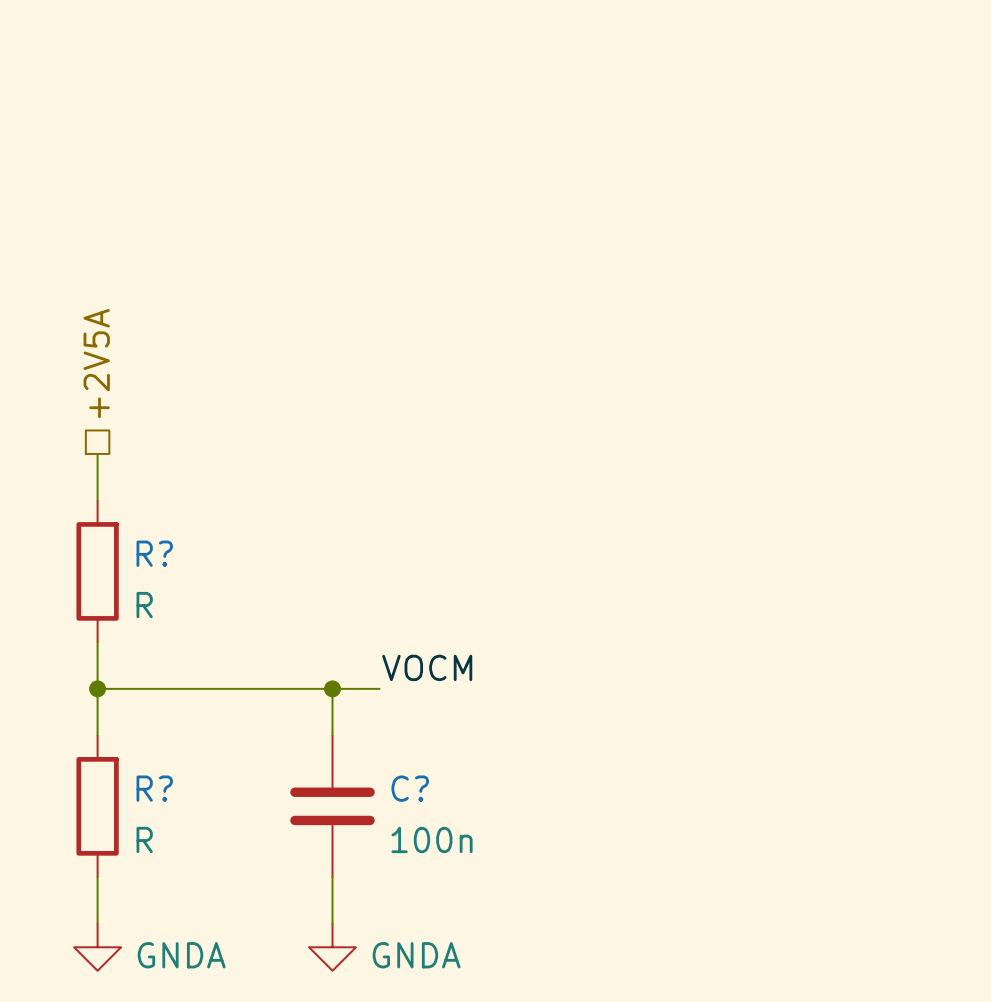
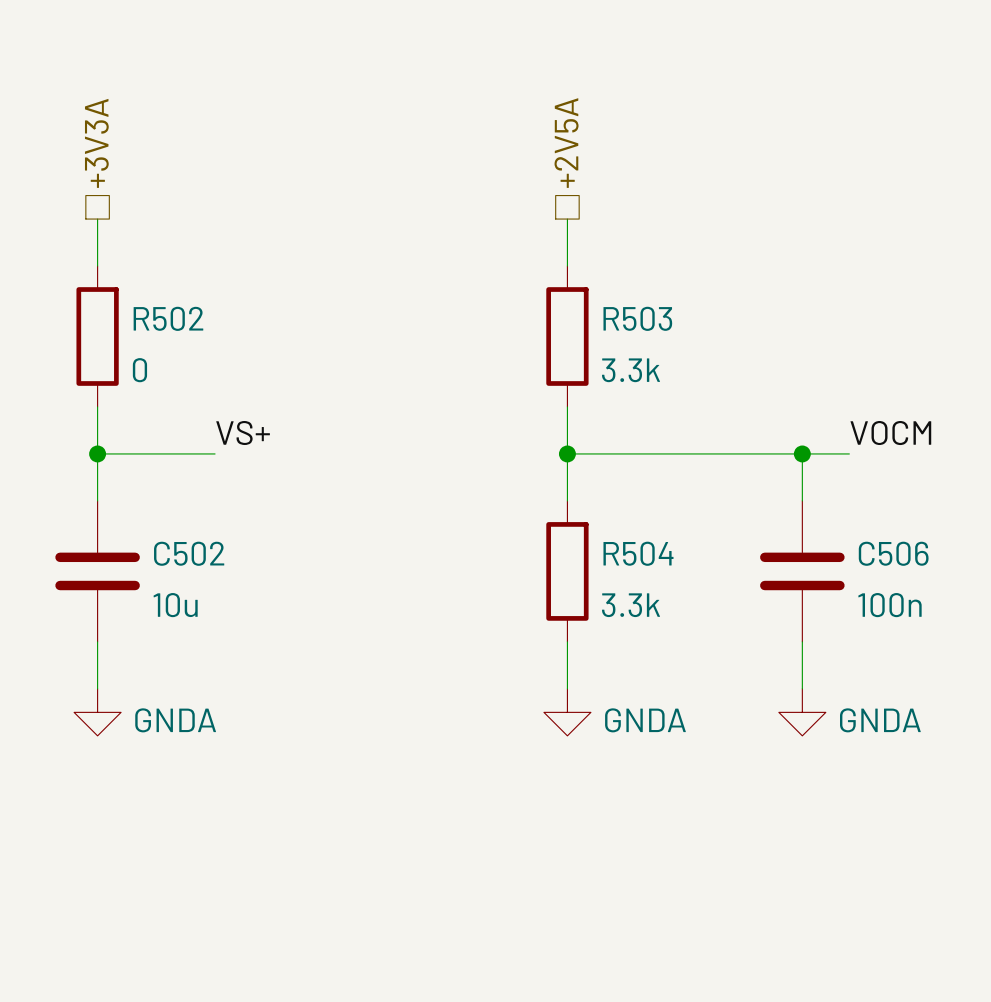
hierarchical label: none -> +3V3A (96, 143)
hierarchical label: none -> +2V5A (566, 143)
wire: none -> (97, 219) (97, 266)
wire: none -> (567, 219) (567, 266)
R502: none -> 0 (97, 336)
R503: none -> 3.3k (567, 336)
hierarchical label: +2V5A (96, 363) -> none
wire: none -> (97, 406) (97, 453) (215, 453)
wire: none -> (567, 406) (567, 500)
label: none -> VS+ (243, 433)
label: none -> VOCM (890, 433)
junction: none -> (97, 453)
wire: none -> (567, 453) (849, 453)
junction: none -> (567, 453)
wire: none -> (802, 453) (802, 500)
junction: none -> (802, 453)
R?: R (97, 571) -> none
C502: none -> 10u (97, 571)
R504: none -> 3.3k (567, 571)
C506: none -> 100n (802, 571)
wire: none -> (802, 641) (802, 688)
label: VOCM (427, 667) -> none
junction: (97, 688) -> none
wire: (332, 688) (332, 735) -> (567, 641) (567, 688)
junction: (332, 688) -> none
wire: (379, 688) (97, 688) (97, 735) -> none
power symbol: none -> GNDA (97, 712)
power symbol: none -> GNDA (567, 712)
power symbol: none -> GNDA (802, 712)
R?: R (97, 806) -> none
C?: 100n (332, 806) -> none
wire: (97, 876) (97, 923) -> none
wire: (332, 876) (332, 923) -> none
power symbol: GNDA (97, 947) -> none
power symbol: GNDA (332, 947) -> none

